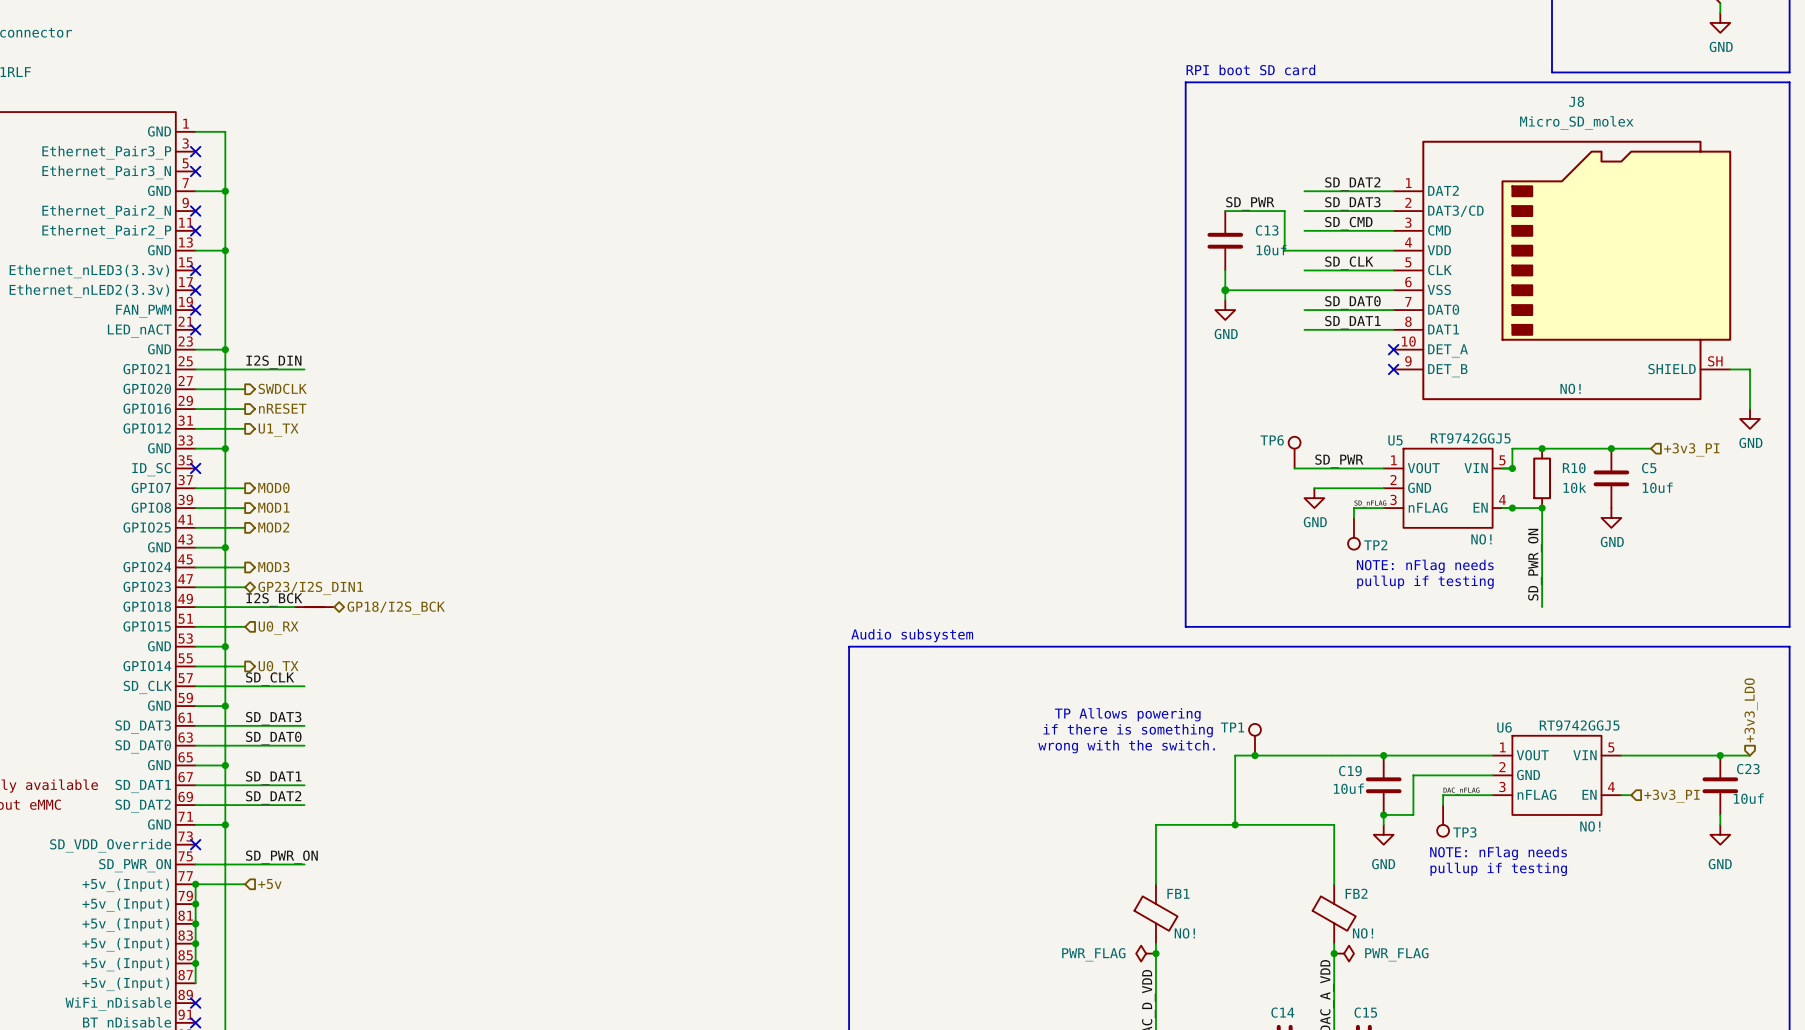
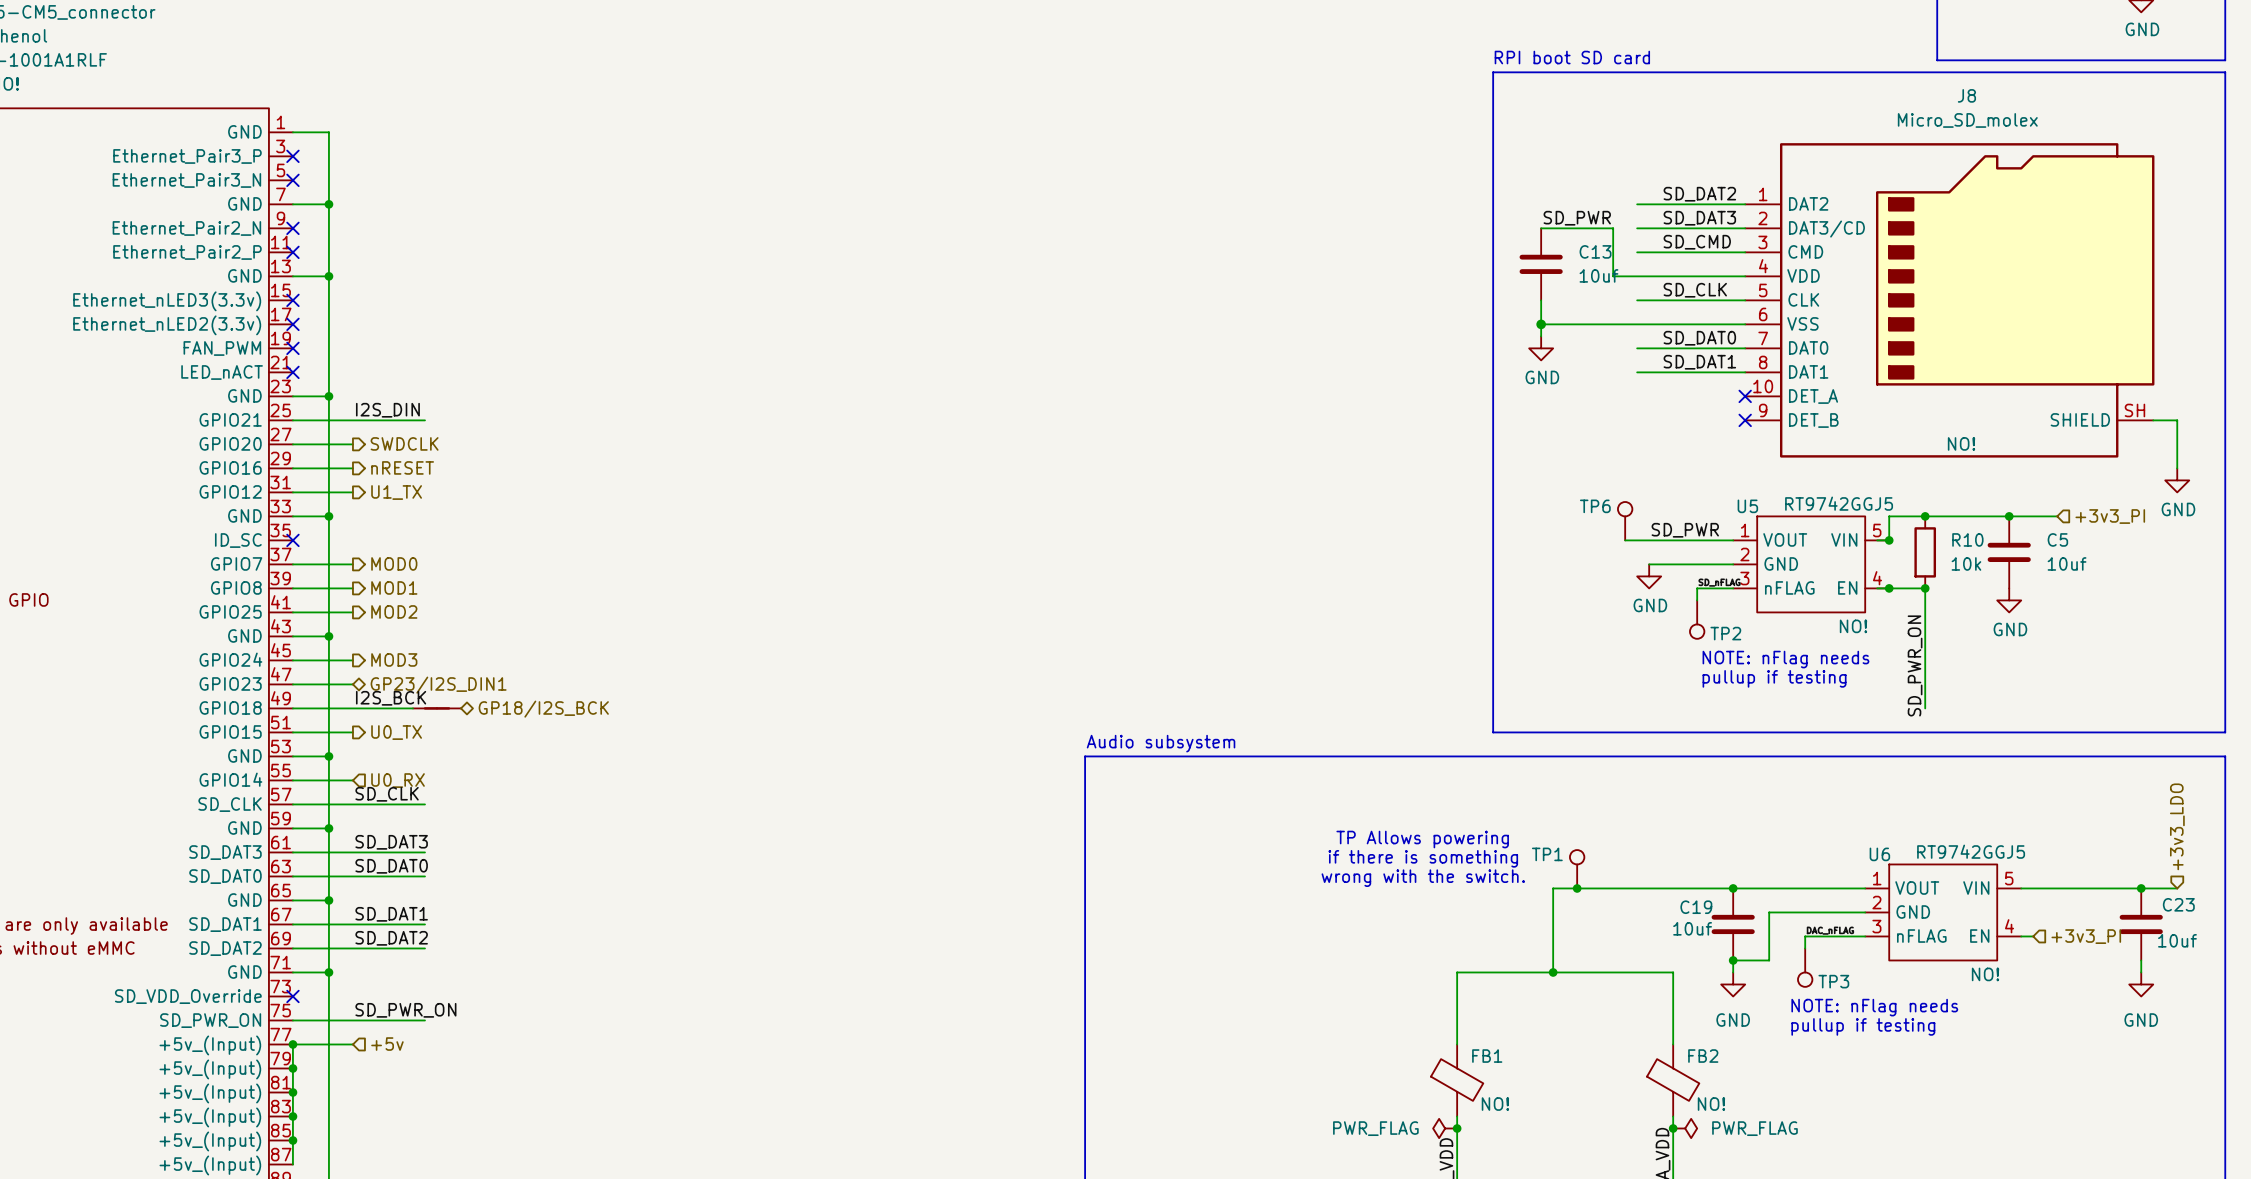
hierarchical label shape: input (278, 628) -> output (396, 732)
hierarchical label: U0_RX (278, 628) -> U0_TX (396, 732)
hierarchical label shape: output (278, 667) -> input (398, 780)
hierarchical label: U0_TX (278, 667) -> U0_RX (398, 780)

